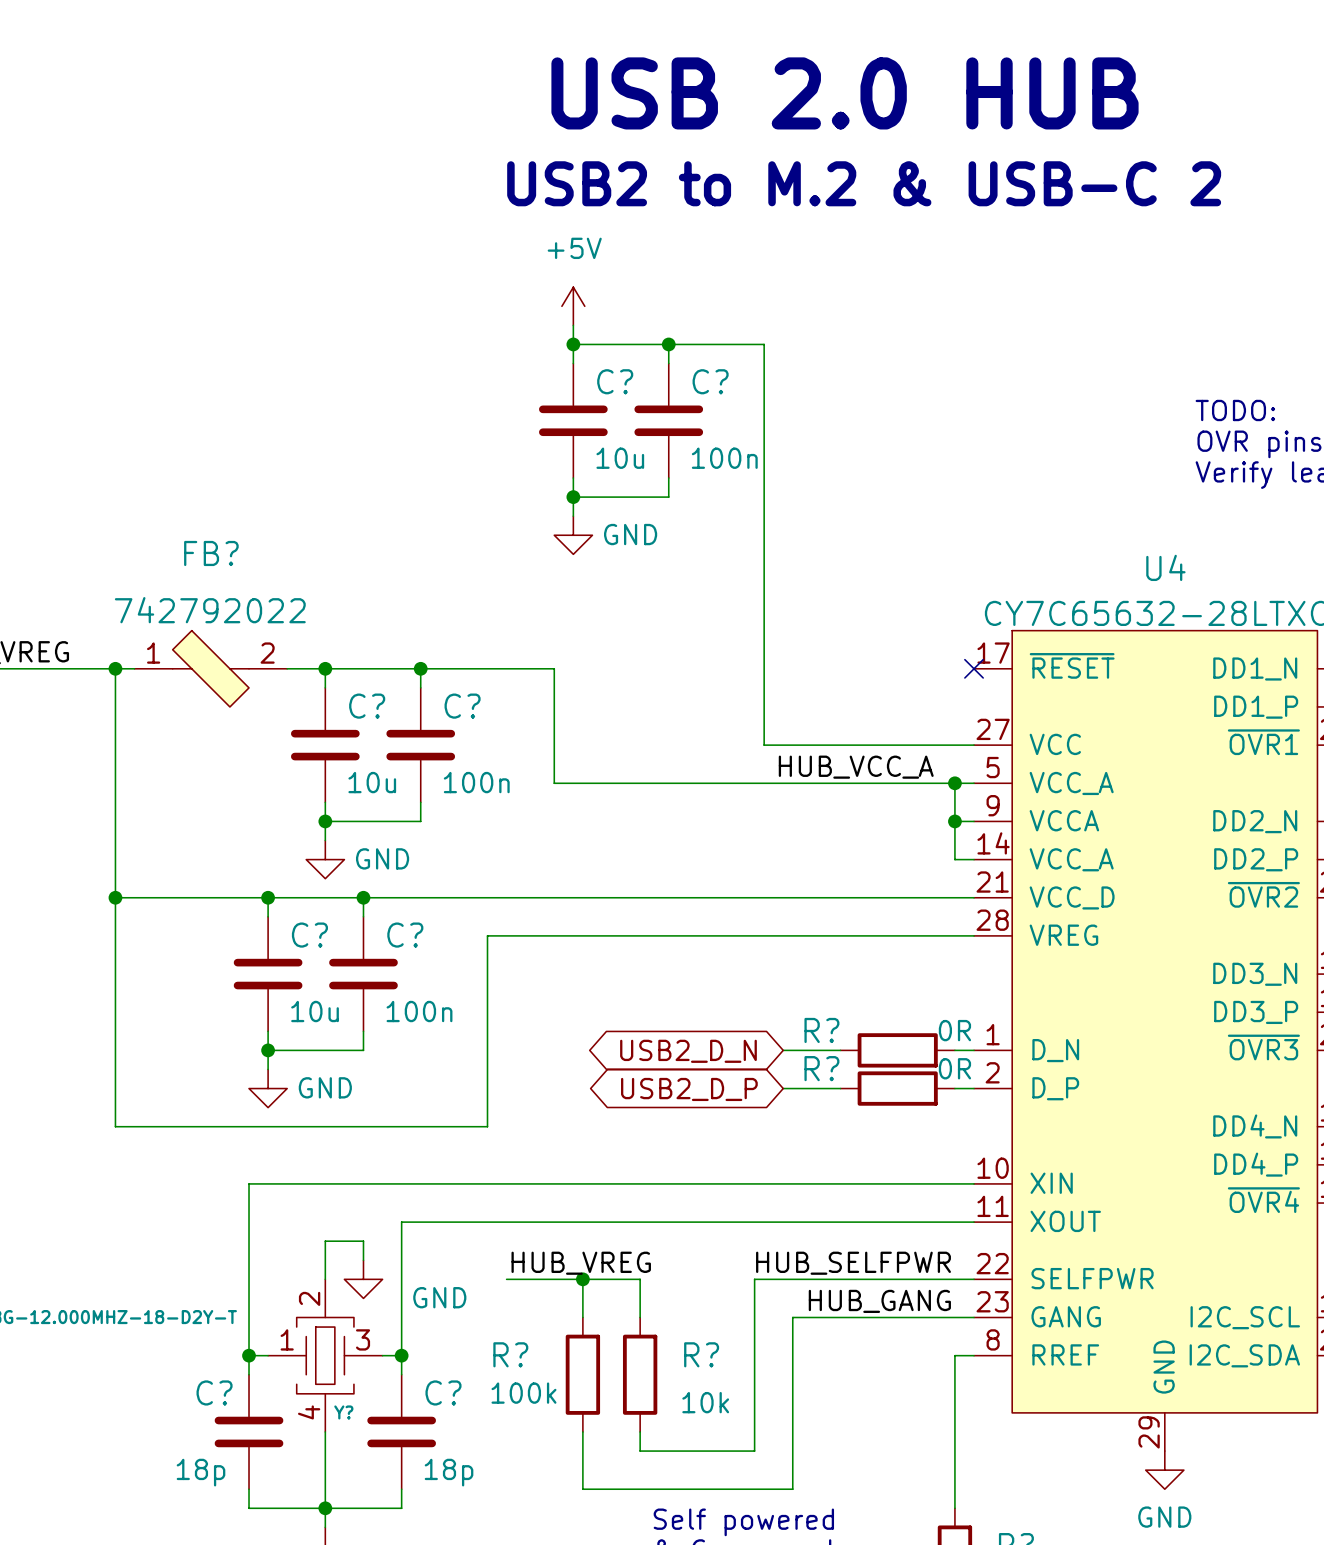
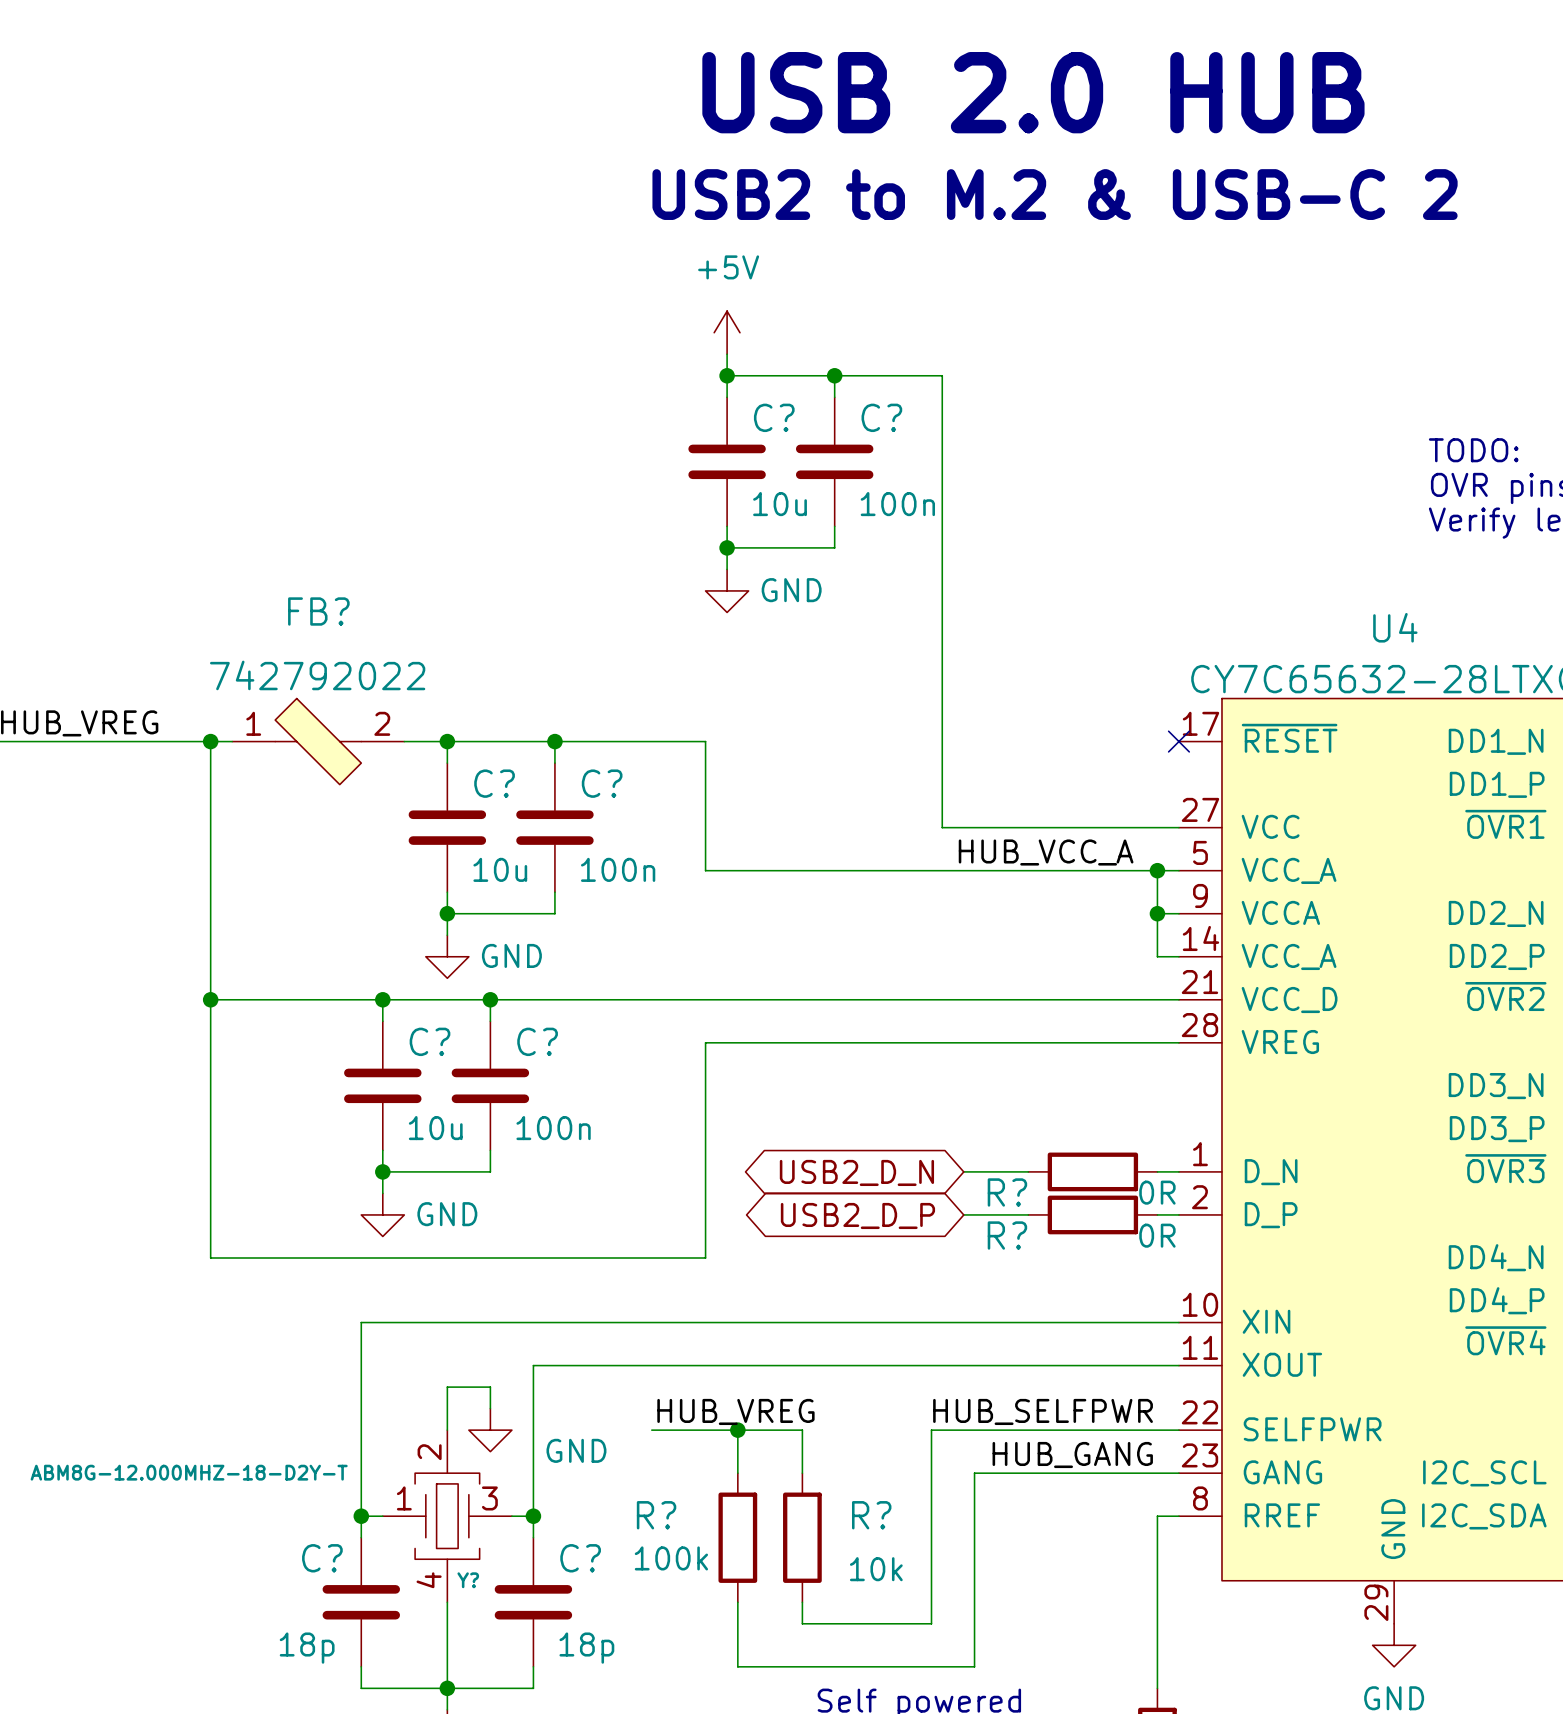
wire: (554, 935) (487, 935) (487, 1126) -> (705, 1042) (705, 1257) (630, 1257)
R? name position: R? (821, 1030) -> R? (1007, 1192)
R? text position: 0R (954, 1030) -> 0R (1157, 1192)
R? name position: R? (821, 1068) -> R? (1007, 1235)
R? text position: 0R (954, 1068) -> 0R (1157, 1235)

